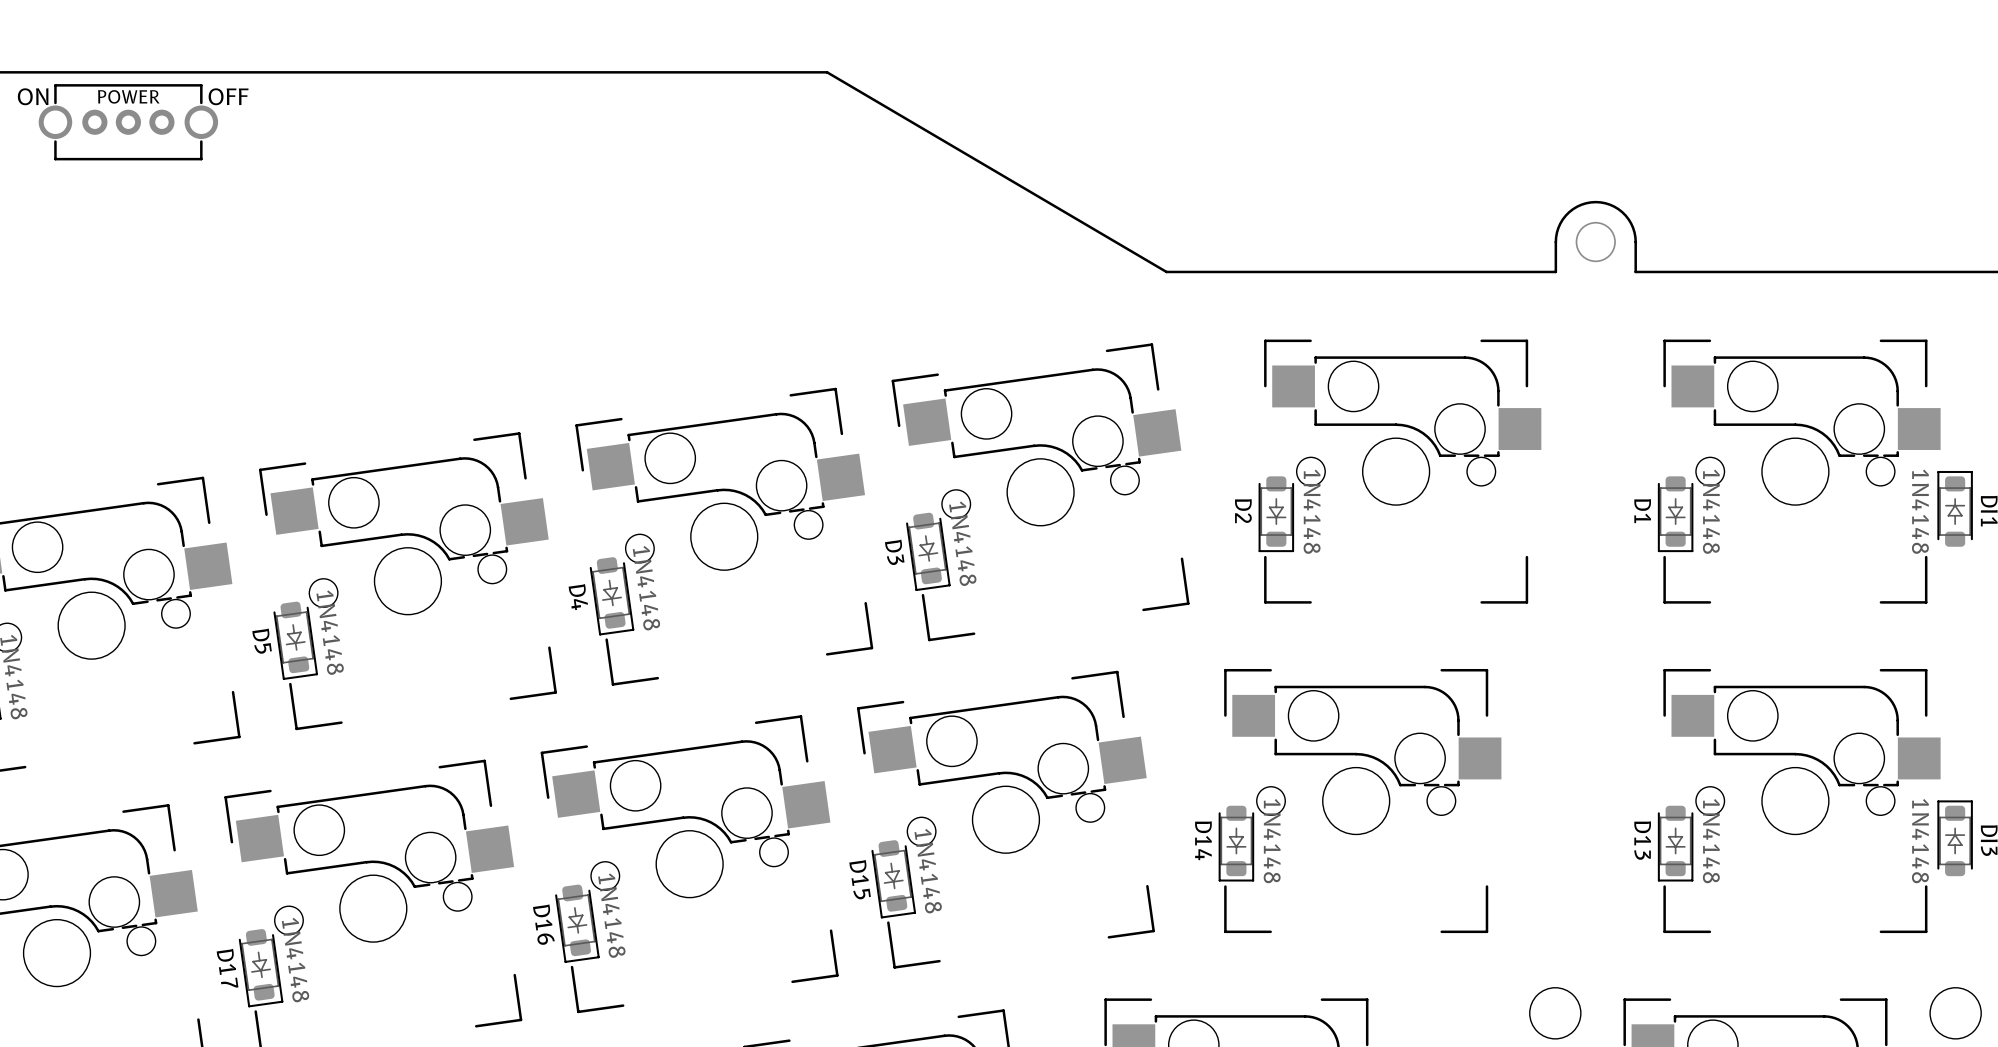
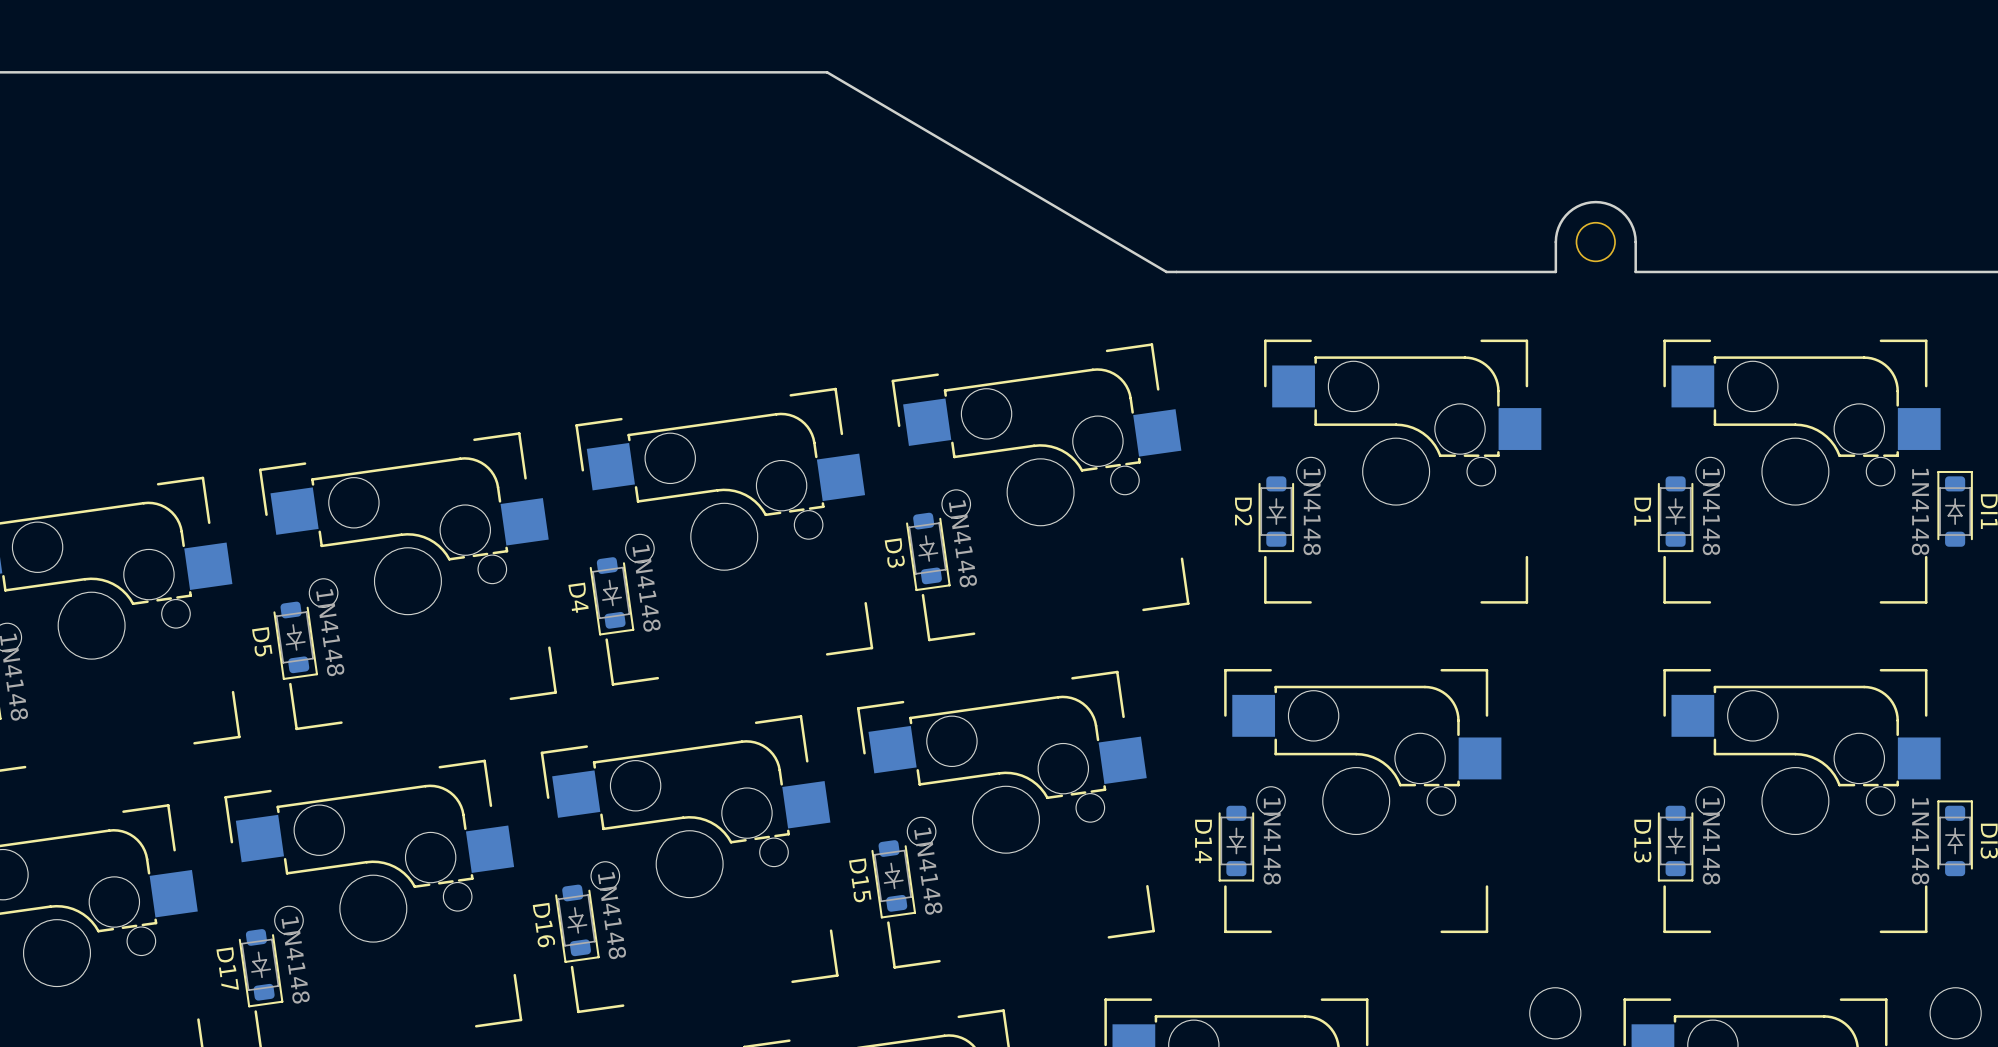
part: (128, 122) -> none

